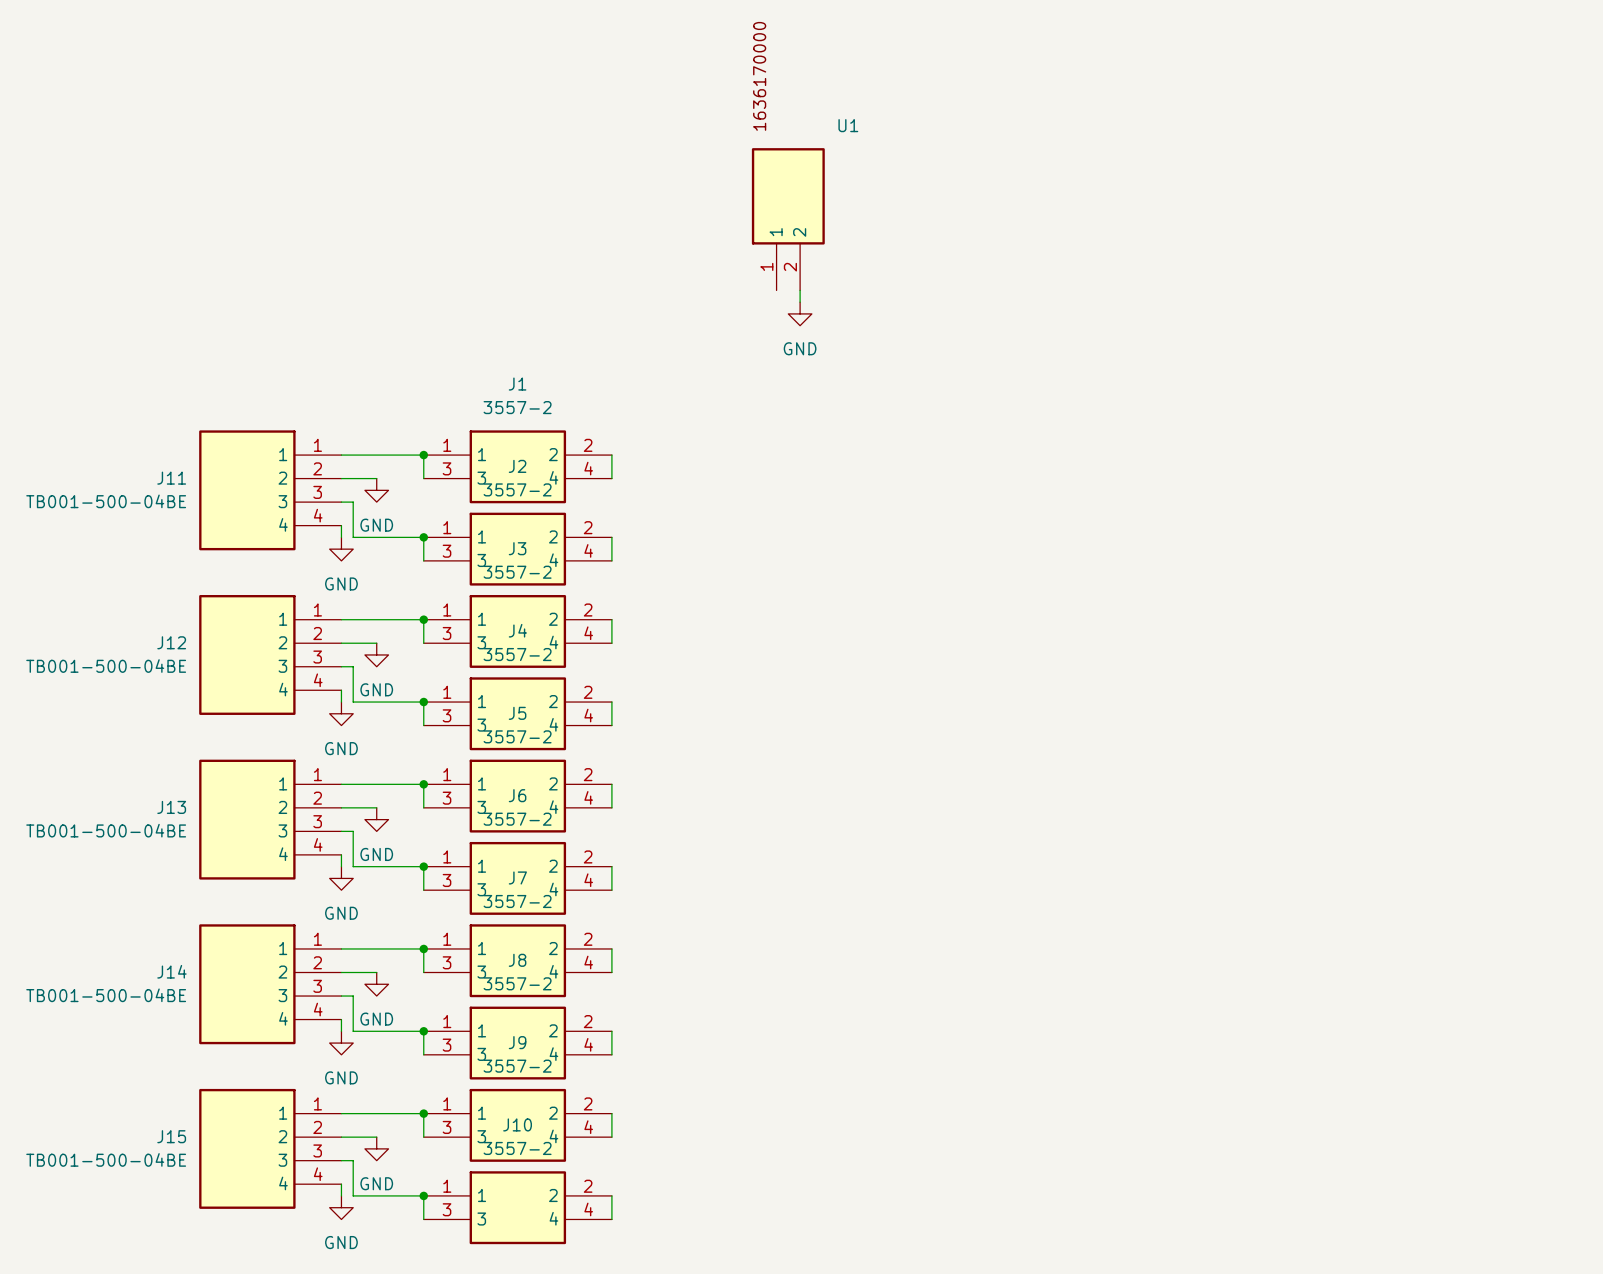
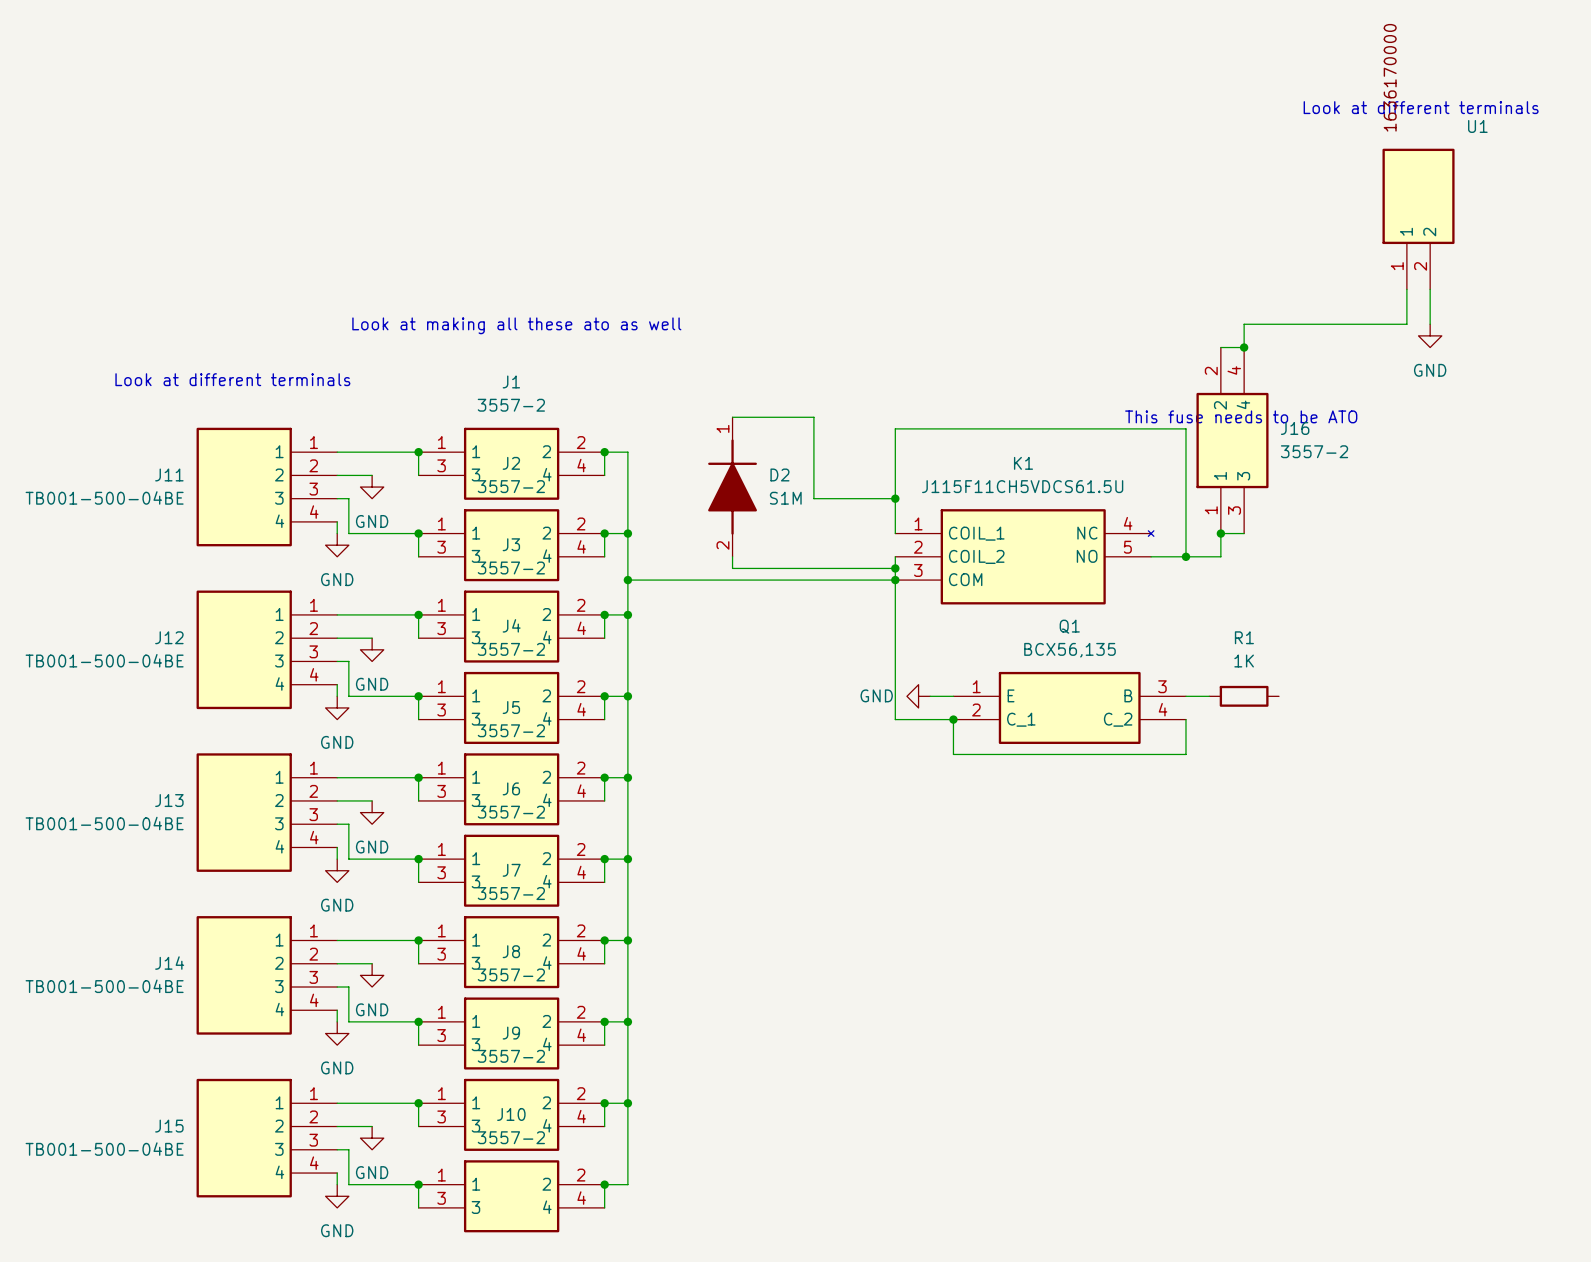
text: none -> Look at different terminals (1421, 107)
U1 position: (788, 219) -> (1418, 219)
wire: (800, 290) (800, 302) -> none
wire: none -> (1406, 289) (1406, 324) (1244, 324) (1244, 347) (1220, 347)
wire: none -> (1430, 289) (1430, 324)
power symbol: GND (800, 313) -> none
text: none -> Look at making all these ato as well (516, 325)
power symbol: none -> GND (1430, 335)
junction: none -> (1244, 347)
text: none -> Look at different terminals (232, 379)
wire: none -> (732, 417) (813, 417) (813, 498) (895, 498)
text: none -> This fuse needs to be ATO (1241, 416)
J16: none -> 3557-2 (1232, 440)
wire: none -> (604, 452) (627, 452) (627, 1184) (604, 1184)
junction: none -> (604, 452)
D2: none -> S1M (732, 487)
junction: none -> (895, 498)
wire: none -> (604, 533) (627, 533)
junction: none -> (604, 533)
junction: none -> (627, 533)
wire: none -> (895, 533) (895, 428) (1185, 428) (1185, 556)
junction: none -> (1220, 533)
wire: none -> (1244, 533) (1220, 533) (1220, 556) (1151, 556)
wire: none -> (732, 556) (732, 568) (895, 568)
wire: none -> (895, 556) (895, 719) (953, 719) (953, 754) (1185, 754) (1185, 719)
K1: none -> J115F11CH5VDCS61.5U (1024, 556)
junction: none -> (1185, 556)
junction: none -> (895, 568)
wire: none -> (627, 580) (895, 580)
junction: none -> (627, 580)
junction: none -> (895, 580)
wire: none -> (604, 614) (627, 614)
junction: none -> (604, 614)
junction: none -> (627, 614)
wire: none -> (604, 696) (627, 696)
junction: none -> (604, 696)
junction: none -> (627, 696)
power symbol: none -> GND (918, 696)
wire: none -> (930, 696) (953, 696)
wire: none -> (1185, 696) (1209, 696)
R1: none -> 1K (1244, 696)
Q1: none -> BCX56,135 (1069, 707)
junction: none -> (953, 719)
wire: none -> (604, 777) (627, 777)
junction: none -> (604, 777)
junction: none -> (627, 777)
wire: none -> (604, 859) (627, 859)
junction: none -> (604, 859)
junction: none -> (627, 859)
wire: none -> (604, 940) (627, 940)
junction: none -> (604, 940)
junction: none -> (627, 940)
wire: none -> (604, 1021) (627, 1021)
junction: none -> (604, 1021)
junction: none -> (627, 1021)
wire: none -> (604, 1103) (627, 1103)
junction: none -> (604, 1103)
junction: none -> (627, 1103)
junction: none -> (604, 1184)

